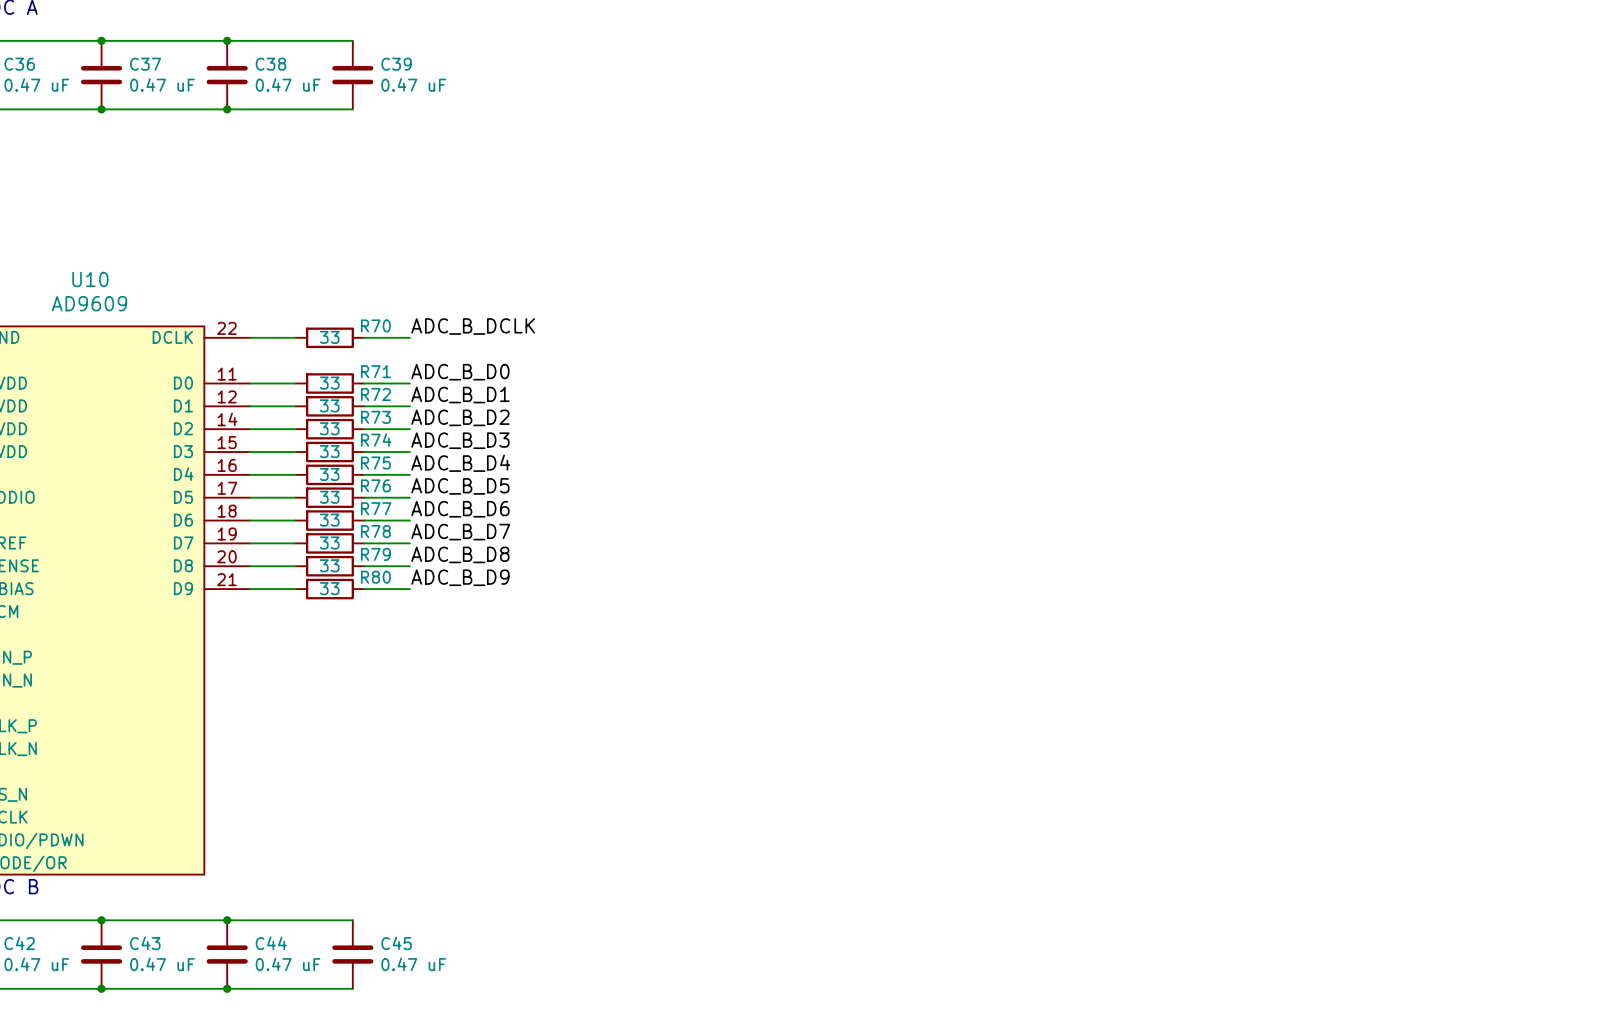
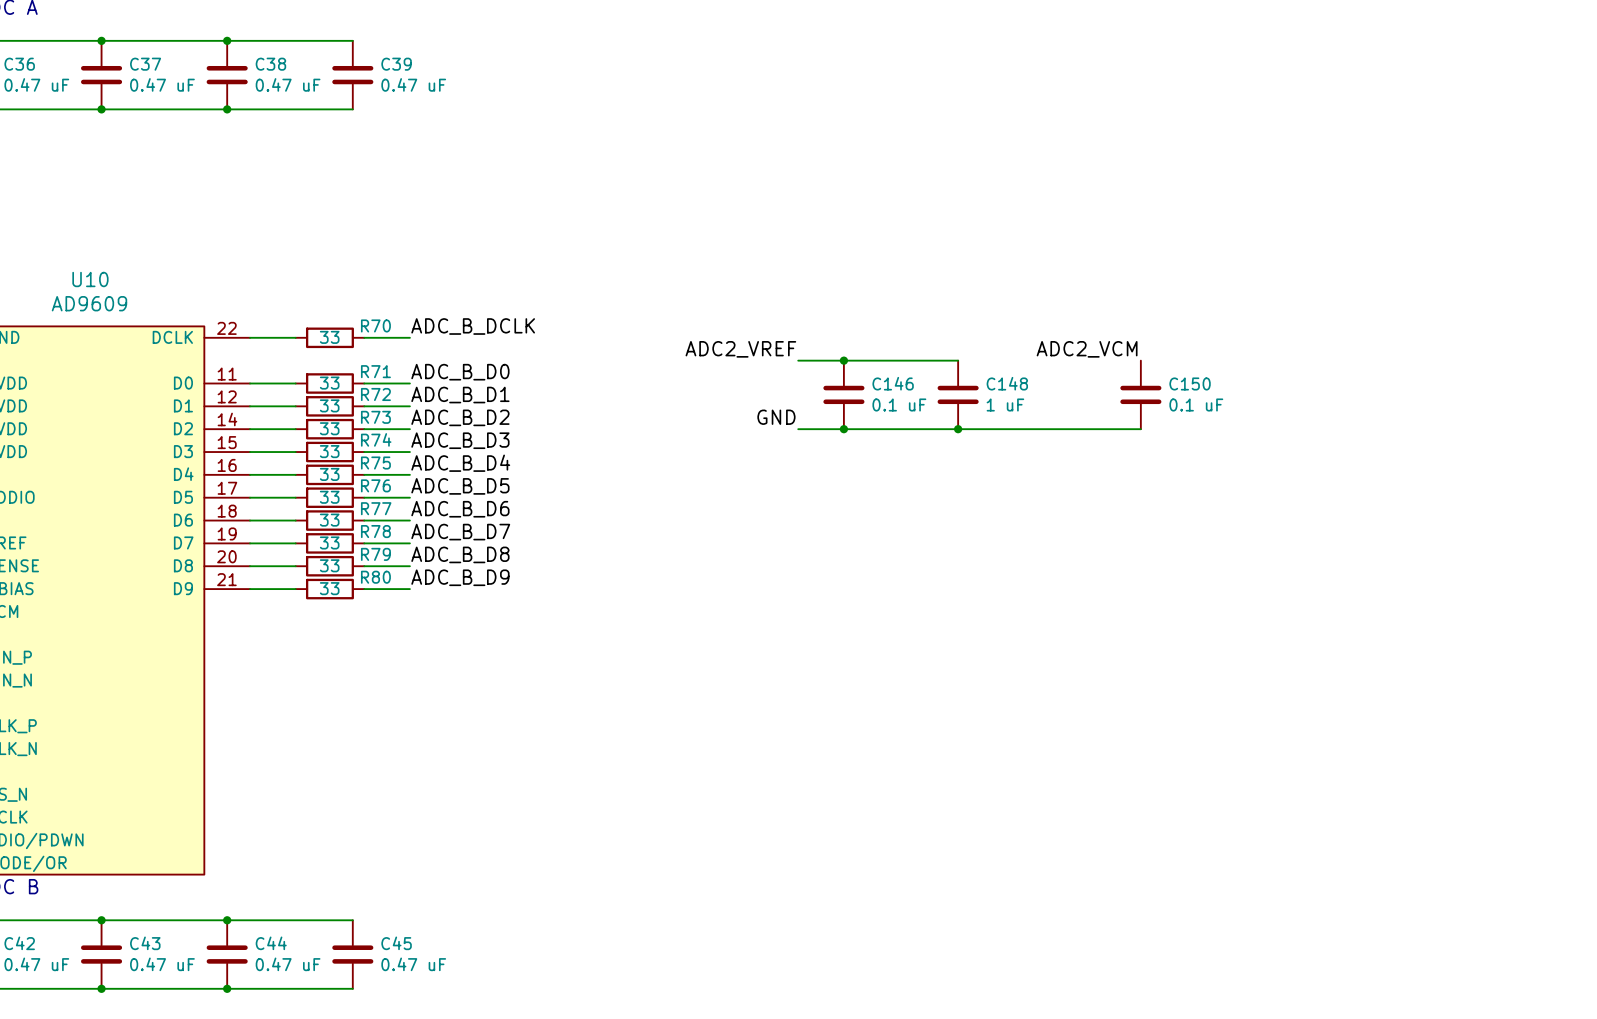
label: none -> ADC2_VREF (740, 349)
label: none -> ADC2_VCM (1087, 349)
wire: none -> (798, 360) (958, 360)
junction: none -> (843, 360)
C146: none -> 0.1 uF (843, 394)
C148: none -> 1 uF (958, 394)
C150: none -> 0.1 uF (1140, 394)
label: none -> GND (776, 417)
wire: none -> (798, 429) (1140, 429)
junction: none -> (843, 429)
junction: none -> (958, 429)

